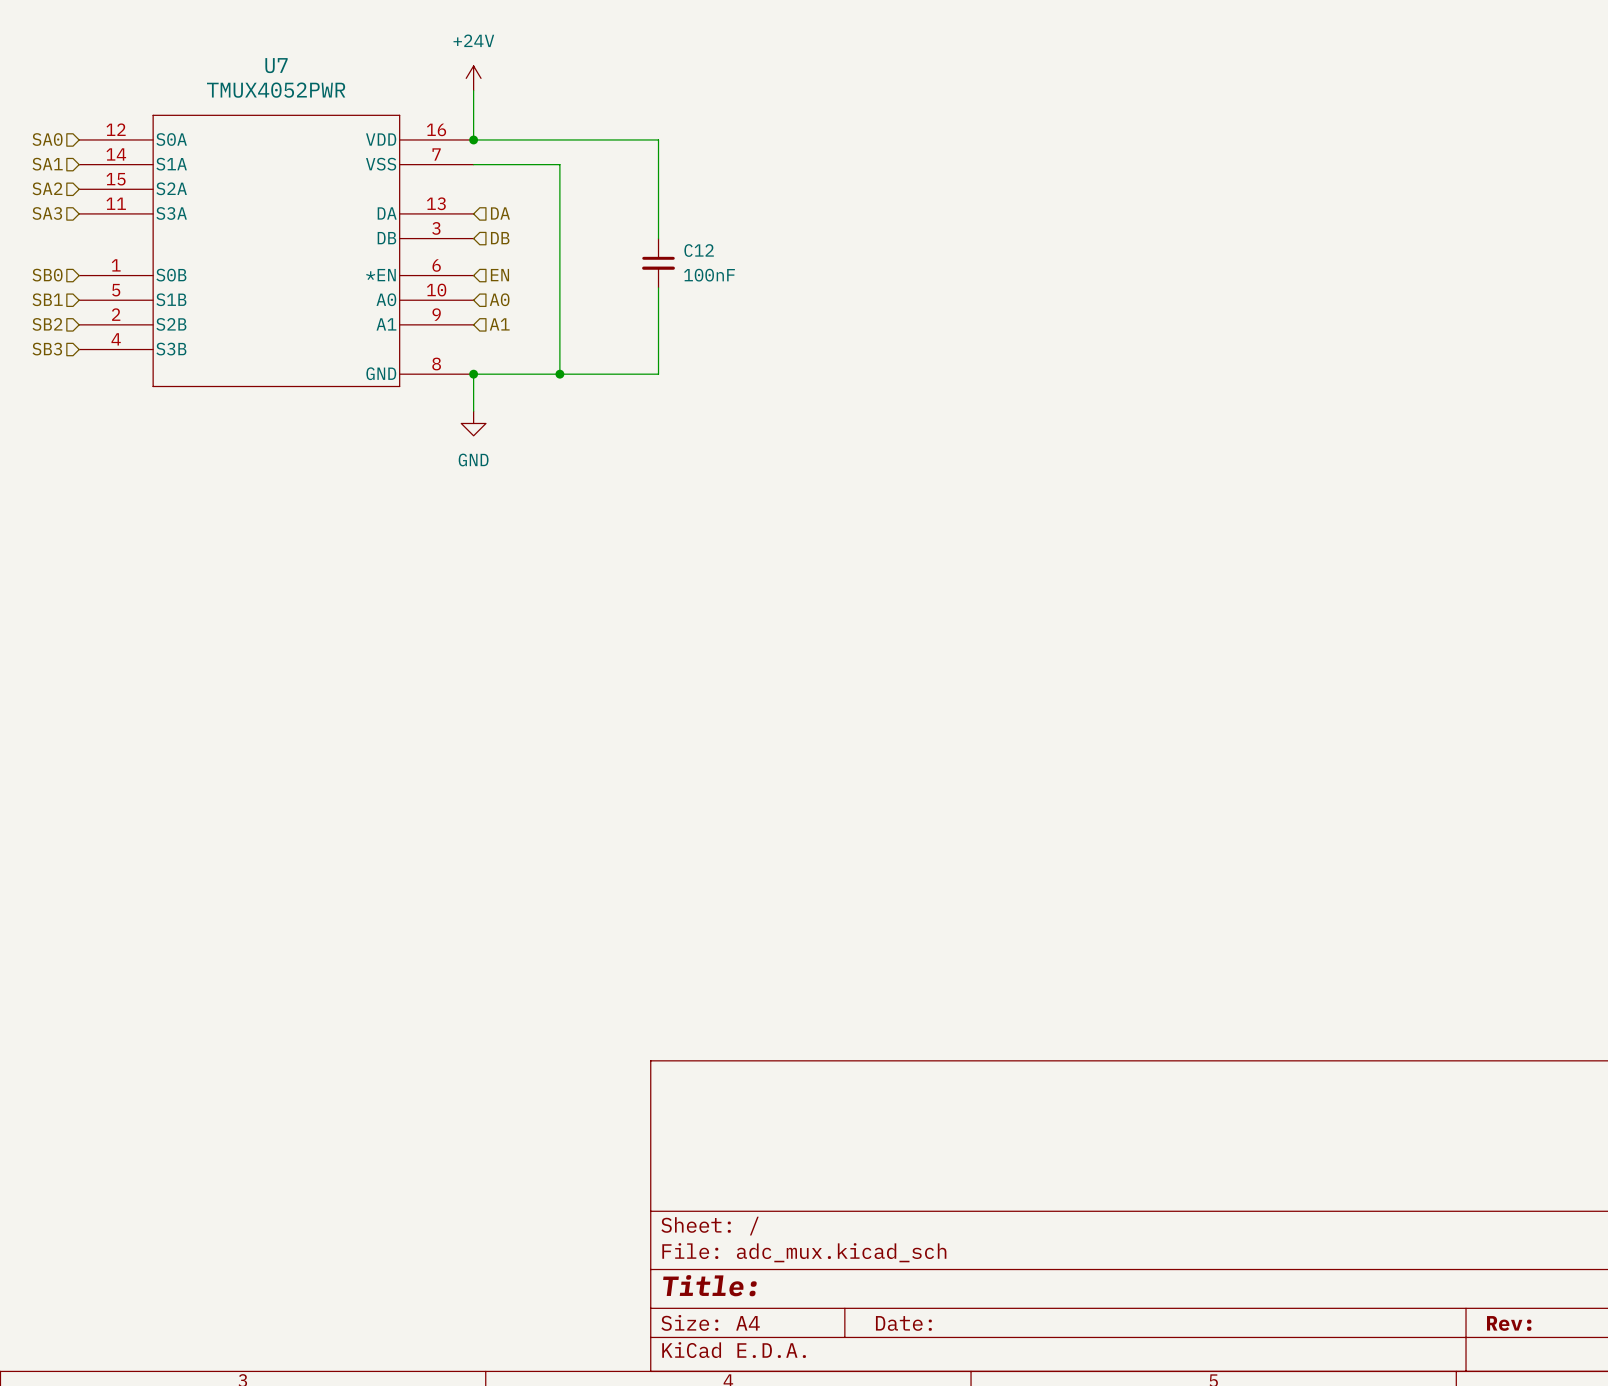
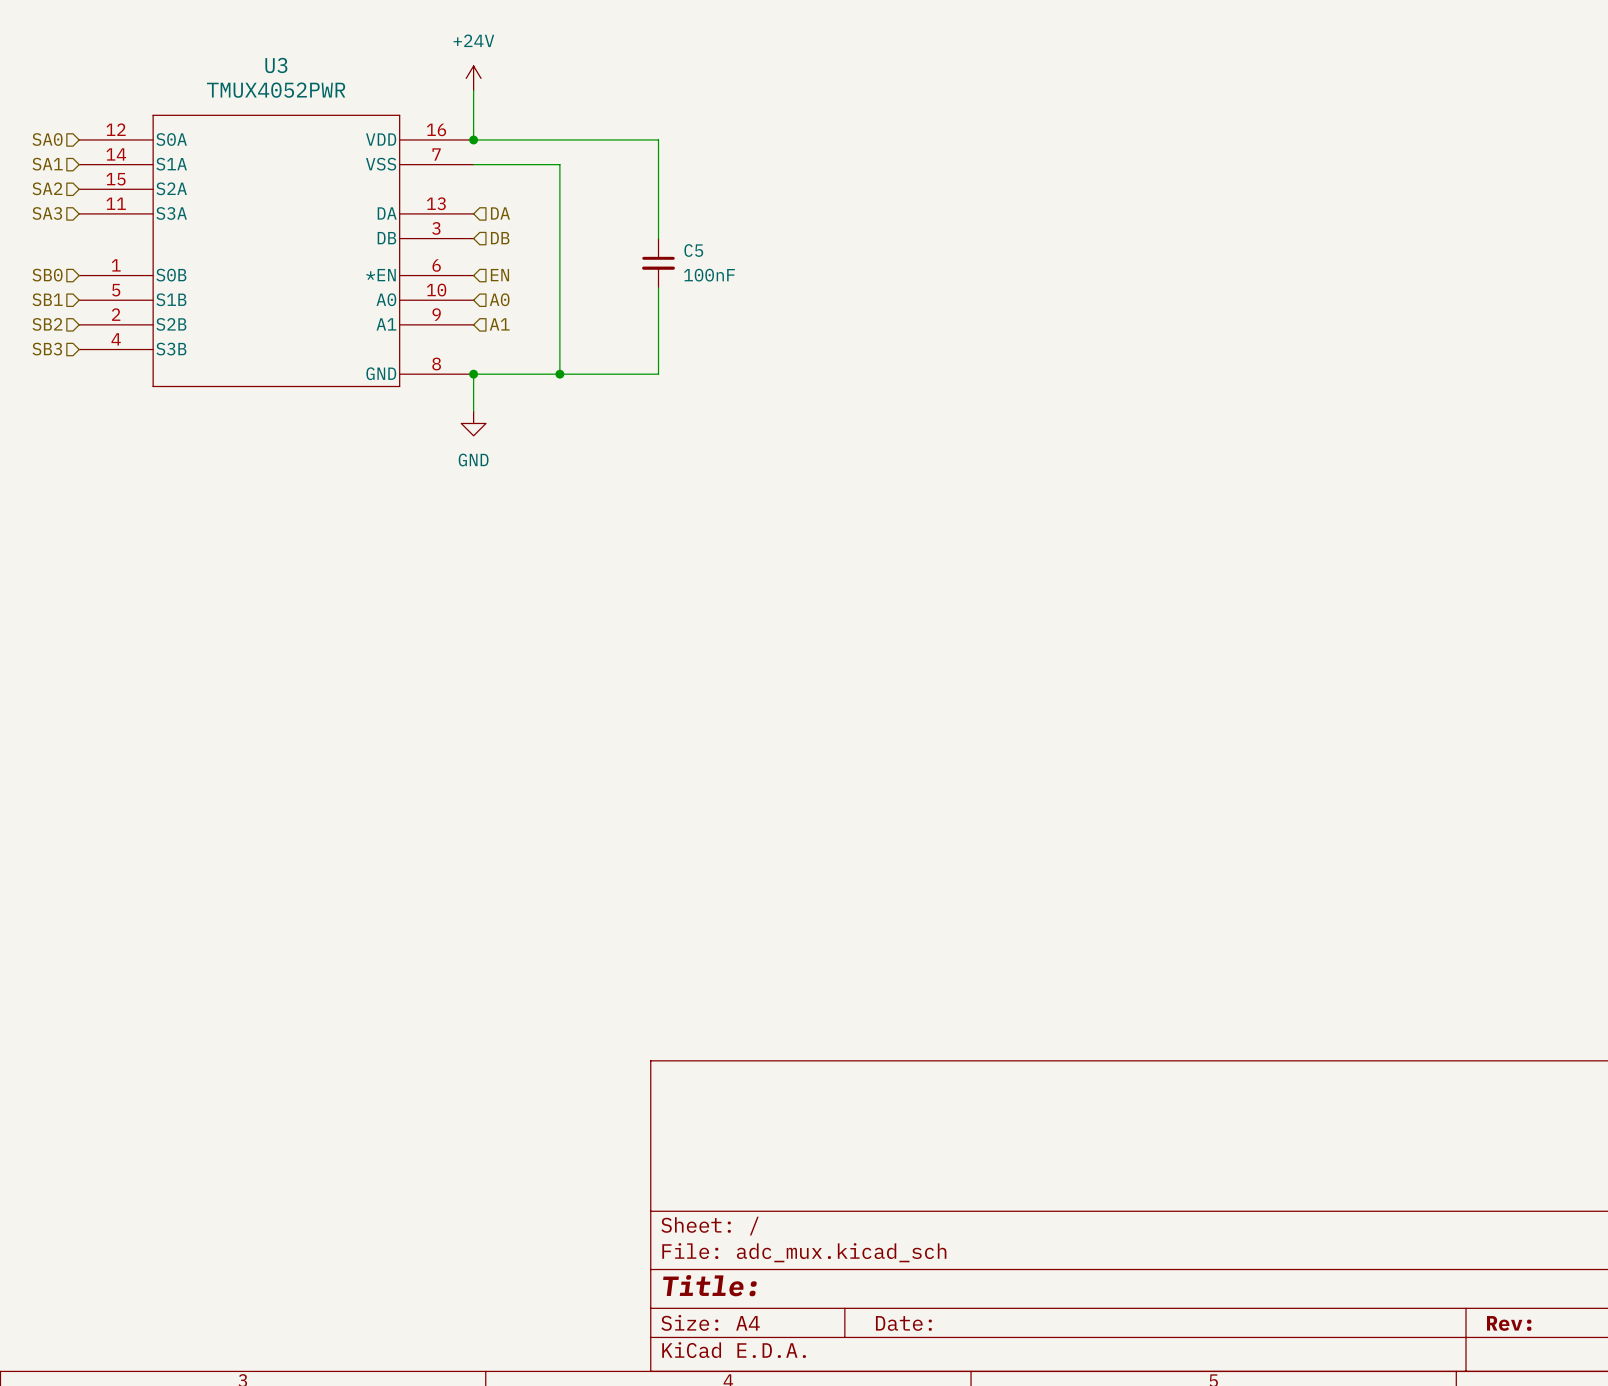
U7 name: U7 (276, 65) -> U3 (276, 65)
C12 name: C12 (699, 250) -> C5 (693, 250)

